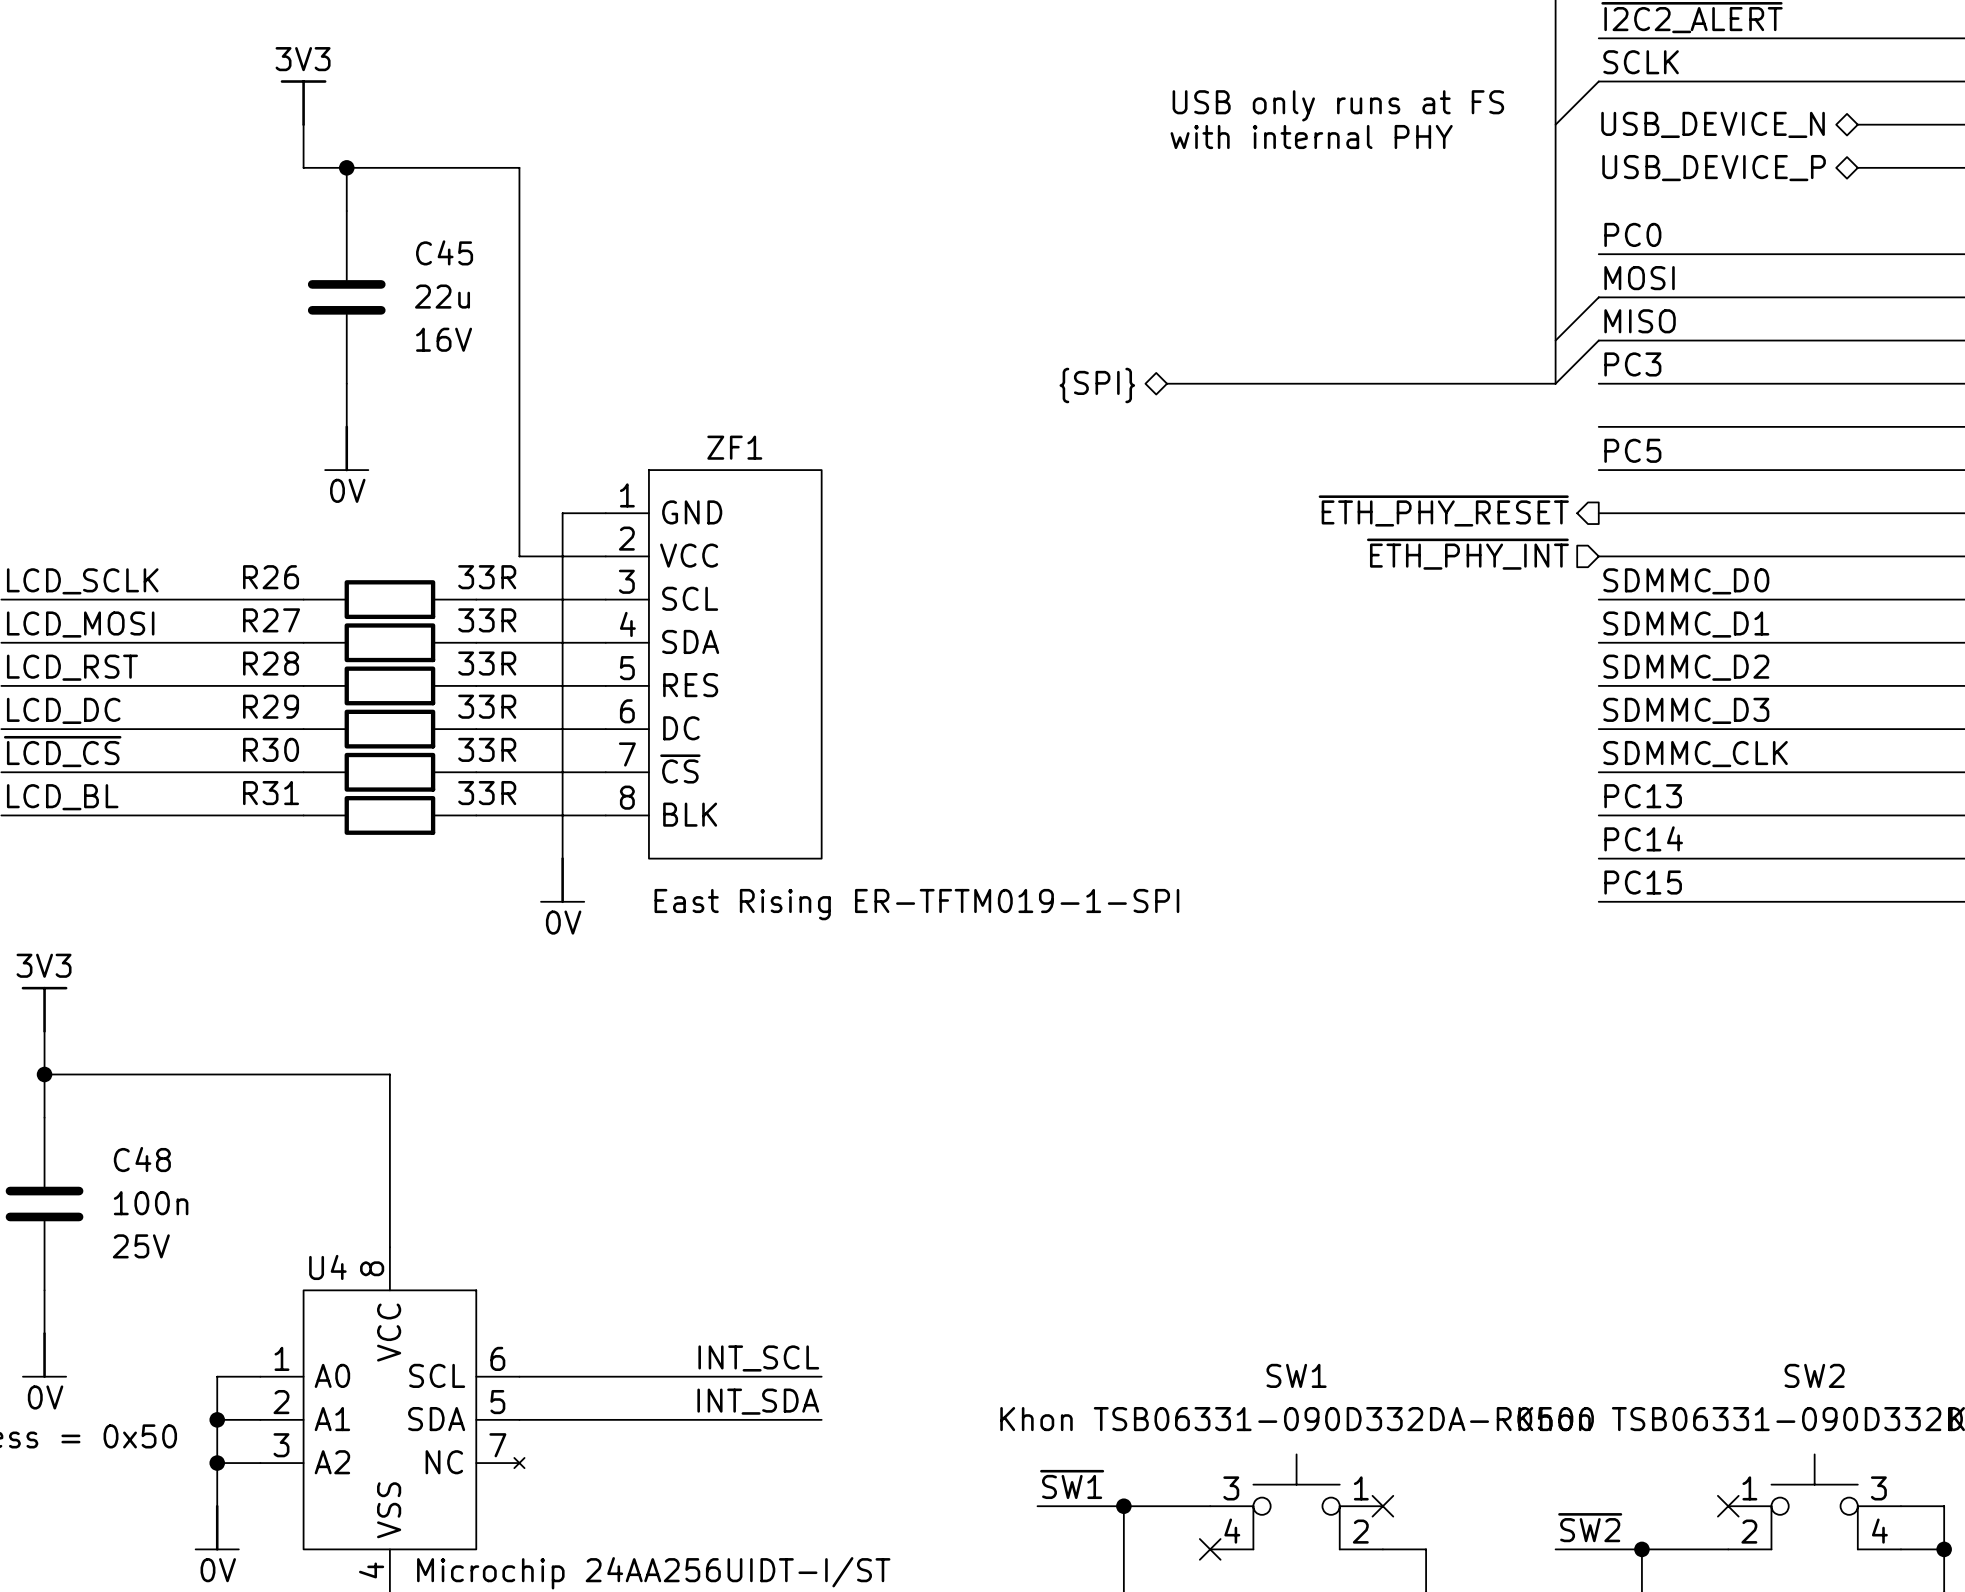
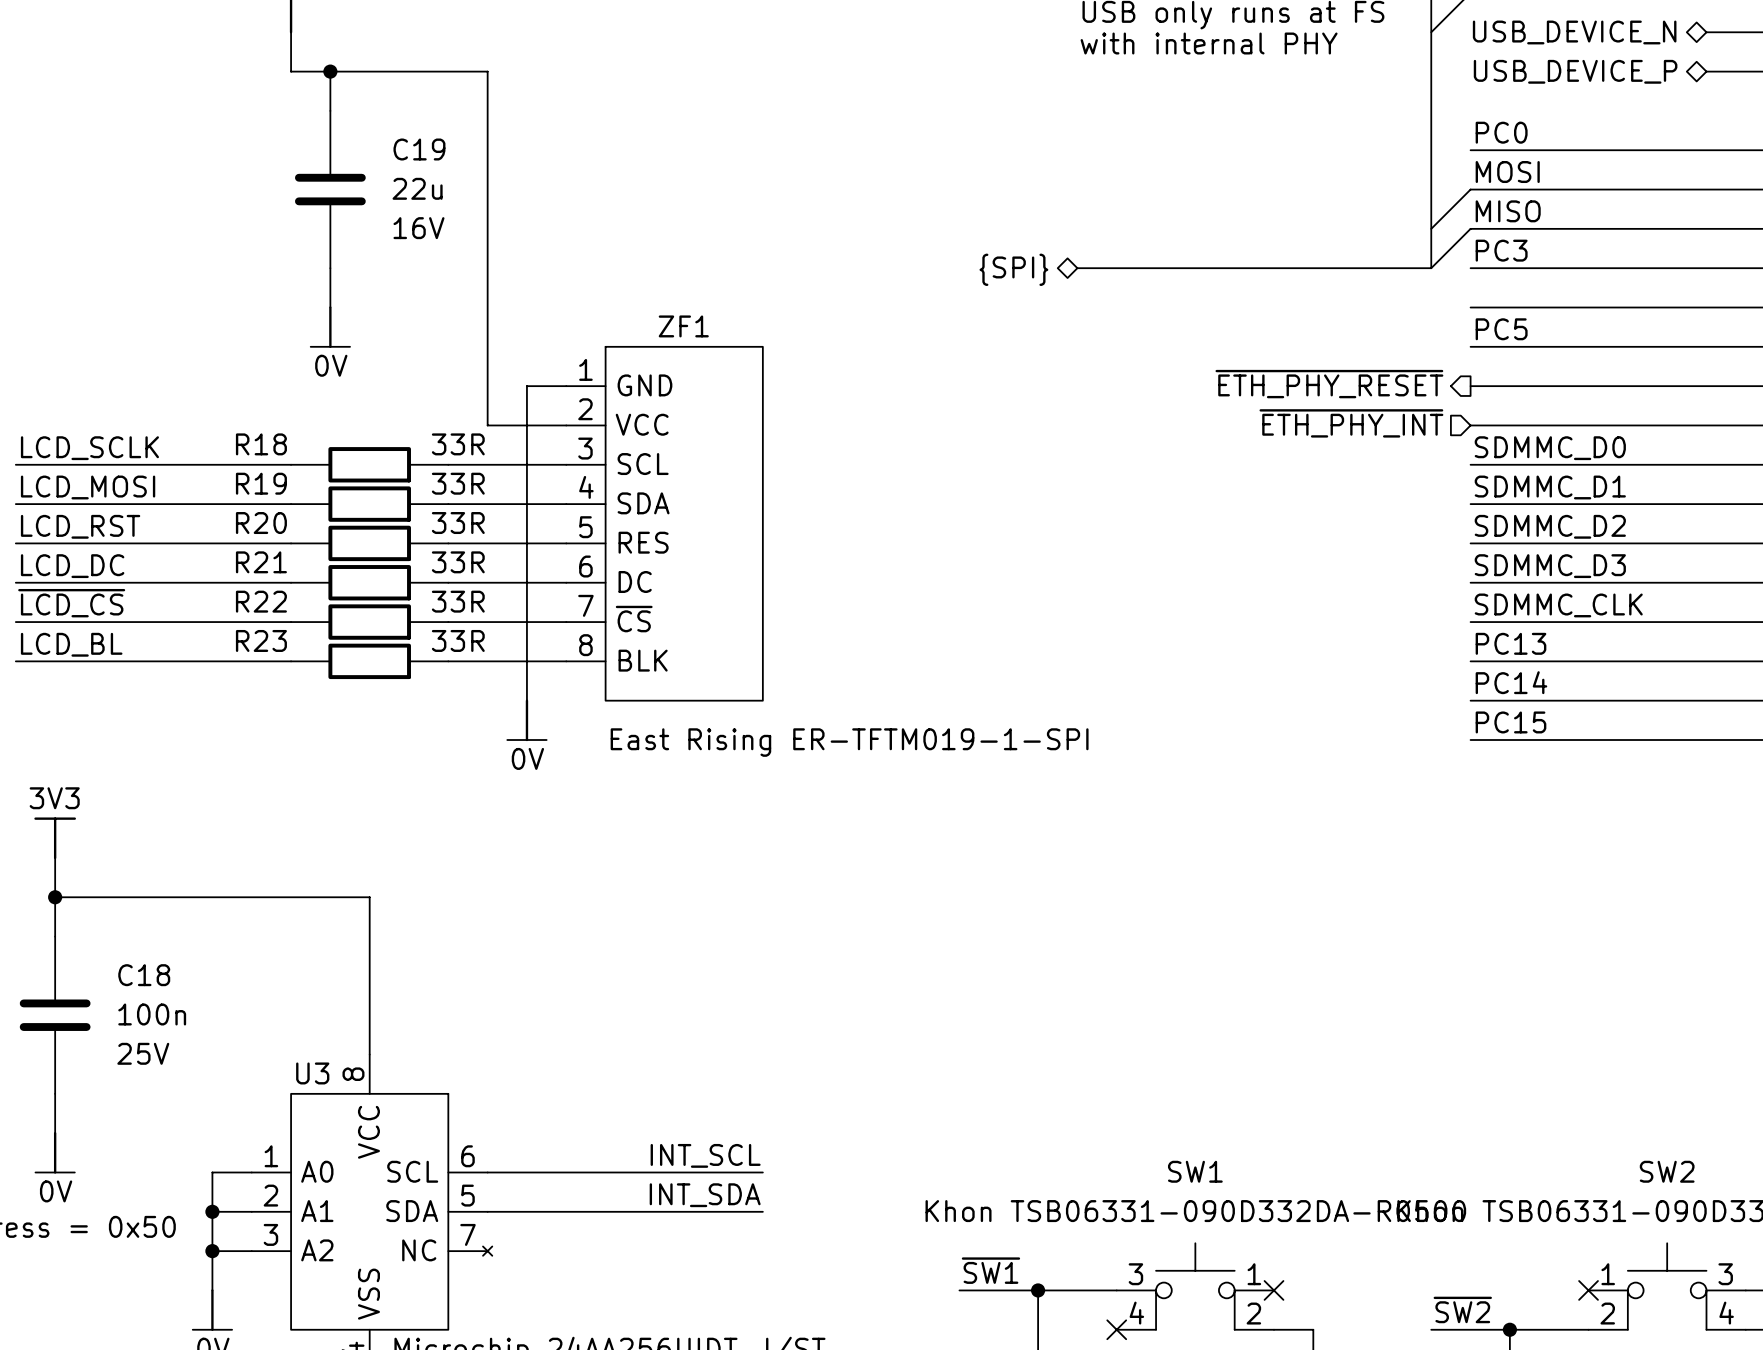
C45 name: C45 (444, 252) -> C19 (419, 149)
R26 name: R26 (271, 577) -> R18 (261, 444)
R27 name: R27 (271, 620) -> R19 (261, 483)
R28 name: R28 (271, 663) -> R20 (261, 523)
R29 name: R29 (271, 706) -> R21 (261, 562)
R30 name: R30 (271, 749) -> R22 (261, 601)
R31 name: R31 (271, 793) -> R23 (261, 640)
C48 name: C48 (142, 1159) -> C18 (144, 975)
U4 name: U4 (327, 1267) -> U3 (312, 1073)

